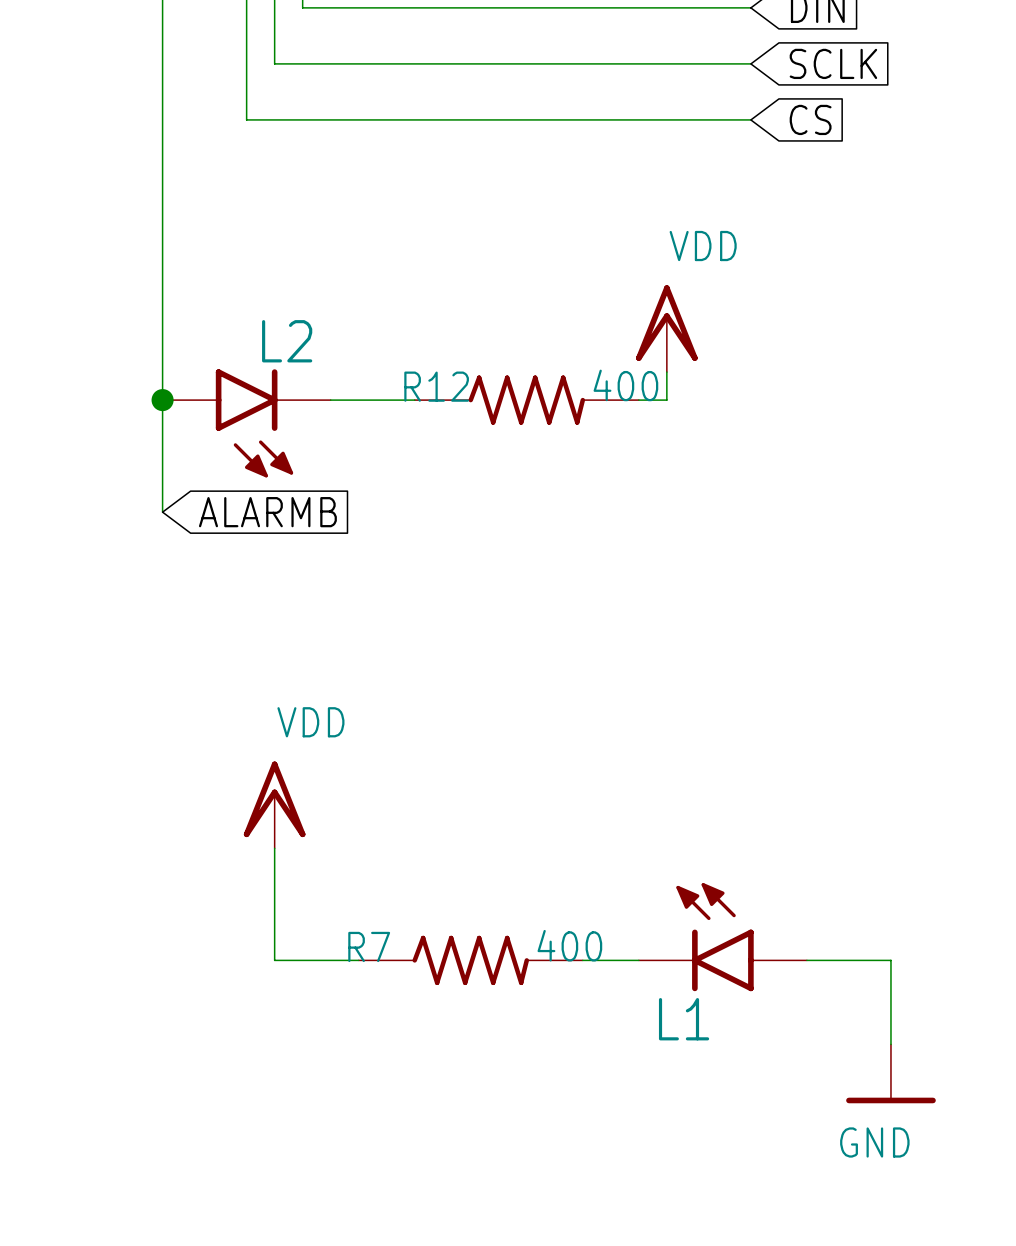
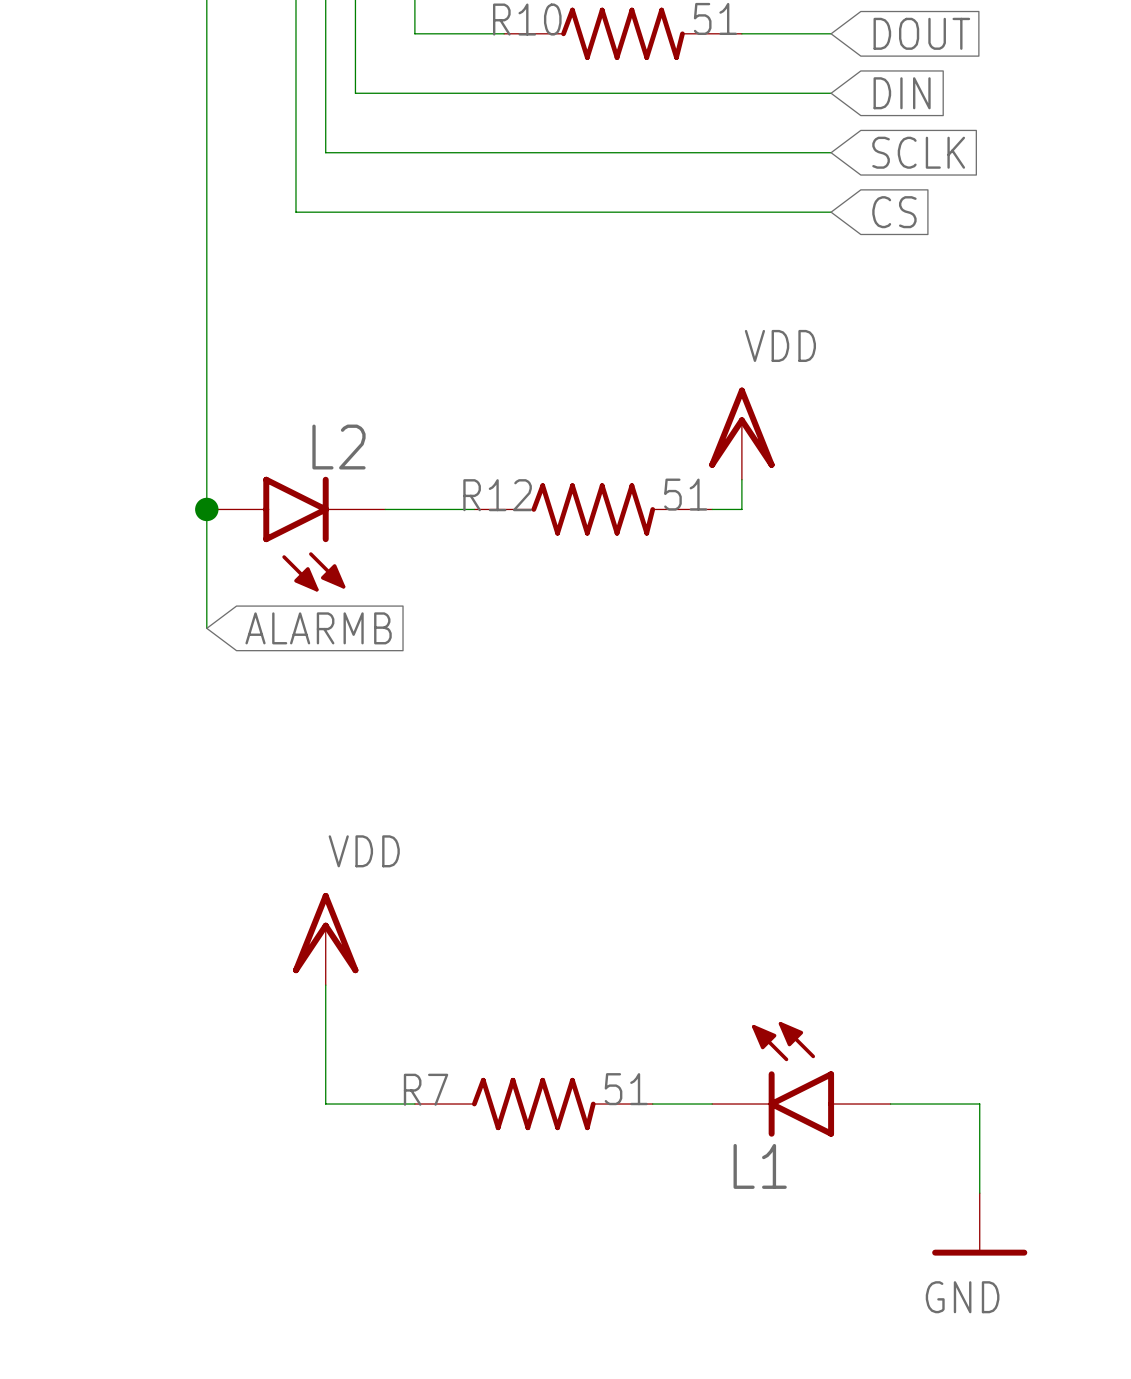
R12 value: 400 (625, 385) -> 51 (685, 494)
R7 value: 400 (569, 945) -> 51 (626, 1089)

